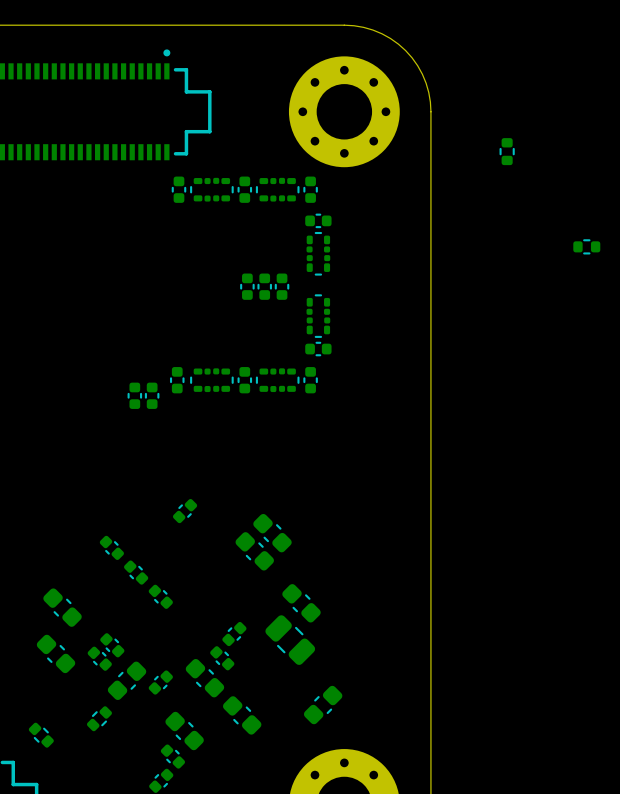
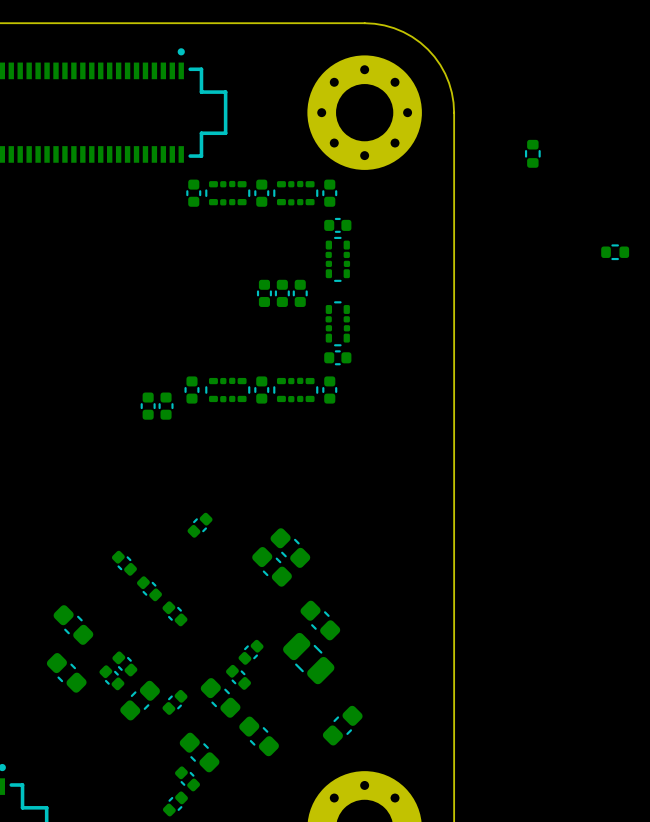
part: (99, 718) -> none
part: (41, 735) -> none

